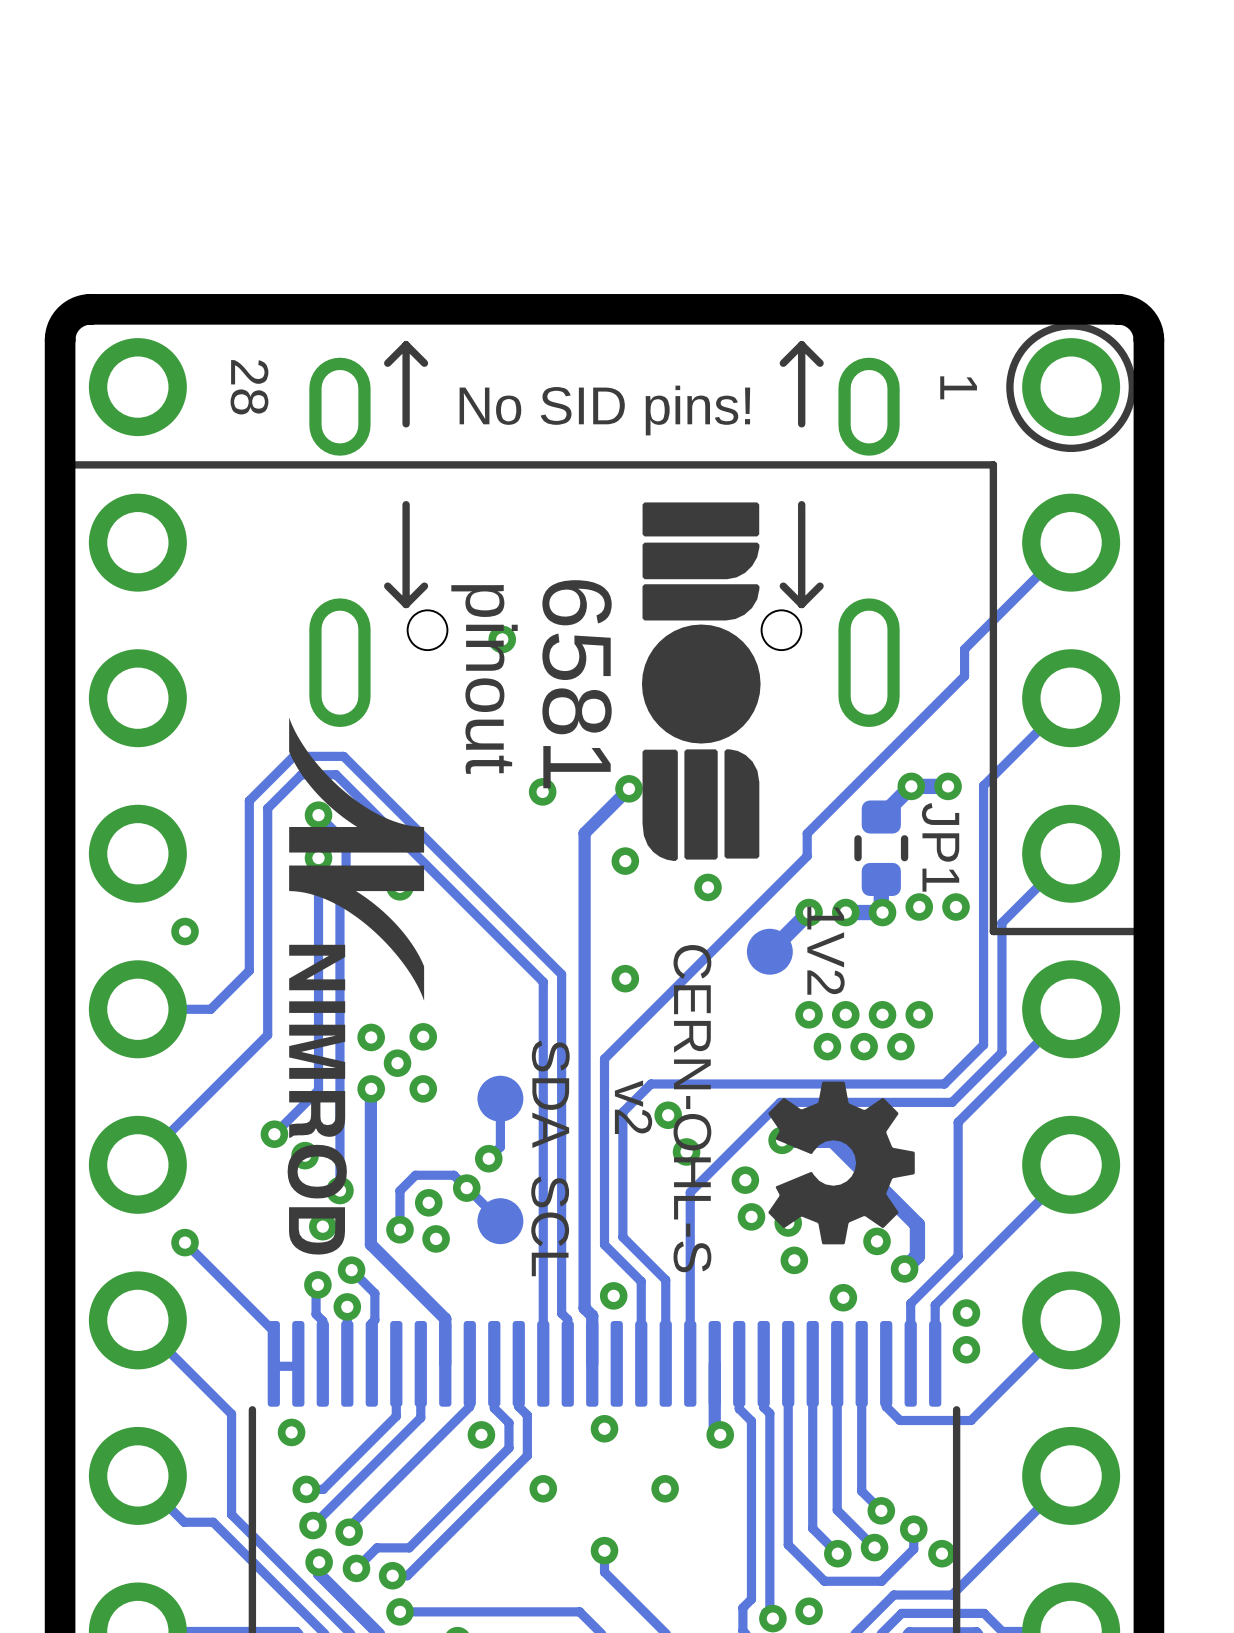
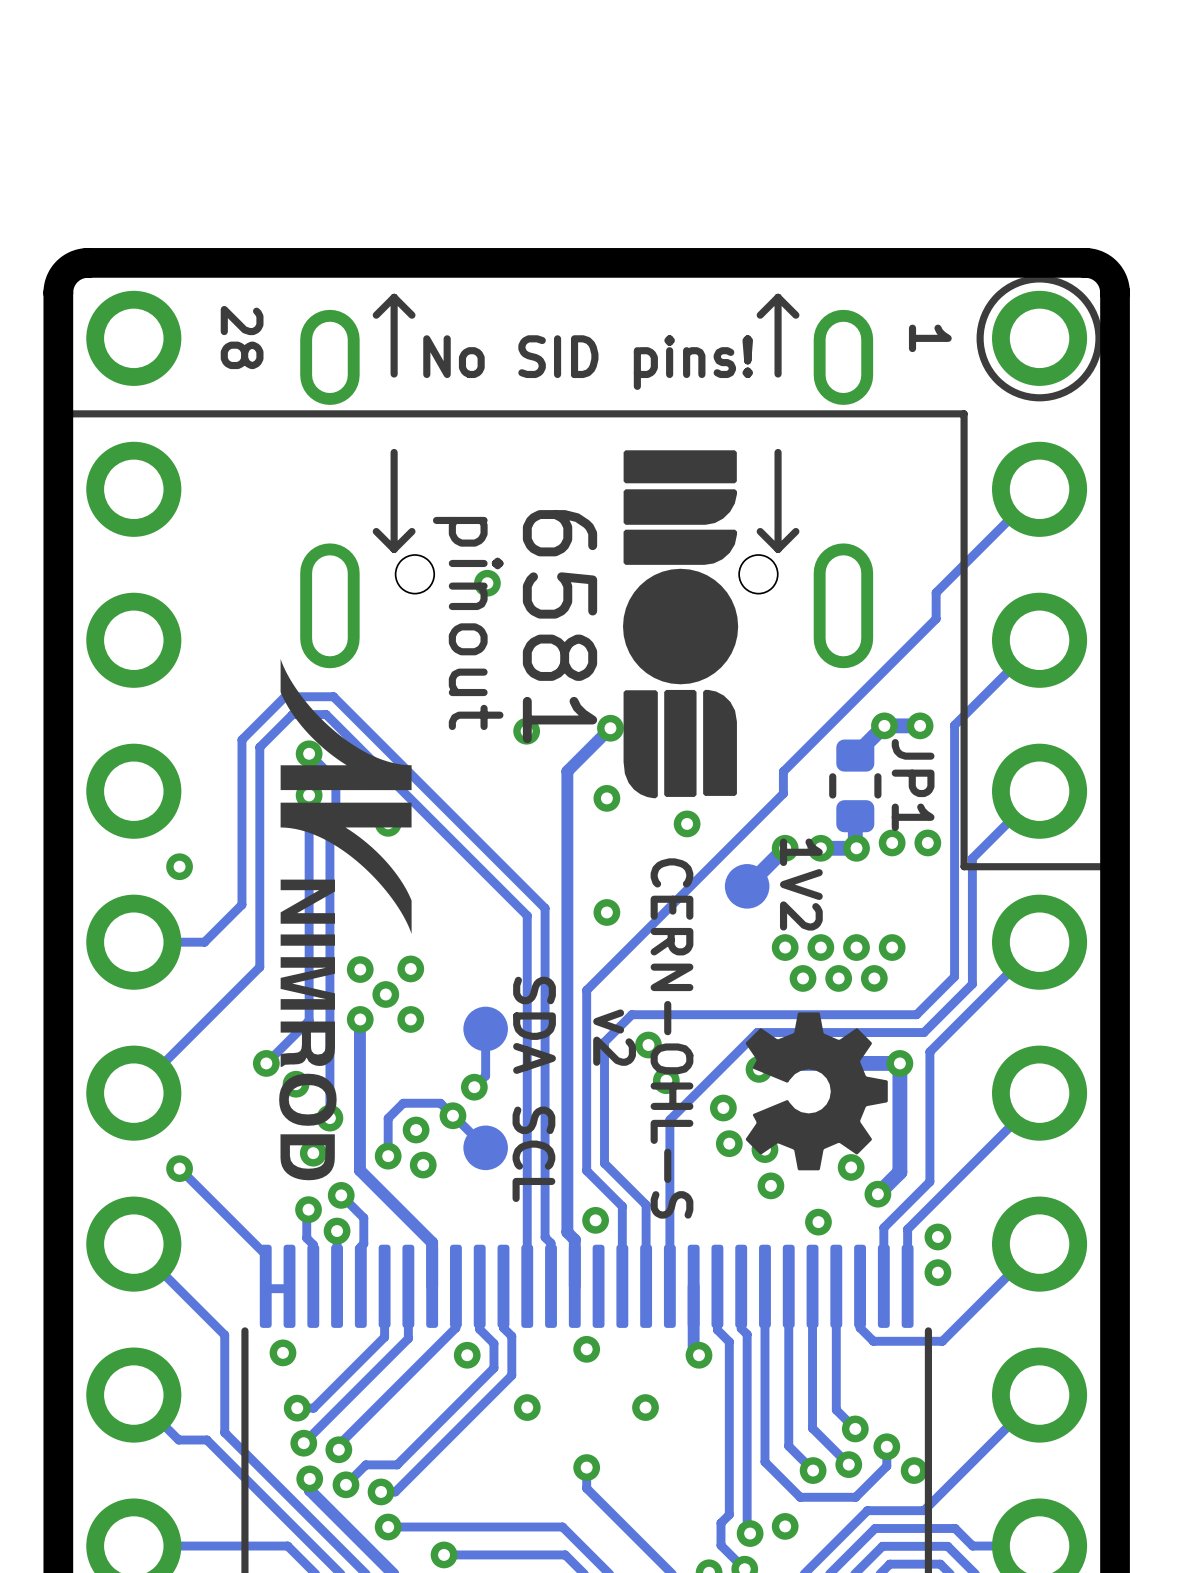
via: none -> (899, 1063)
track: (782, 1140) (832, 1140) (917, 1224) (917, 1256) -> (759, 1069) (764, 1063) (899, 1063) (899, 1172) (890, 1181)

